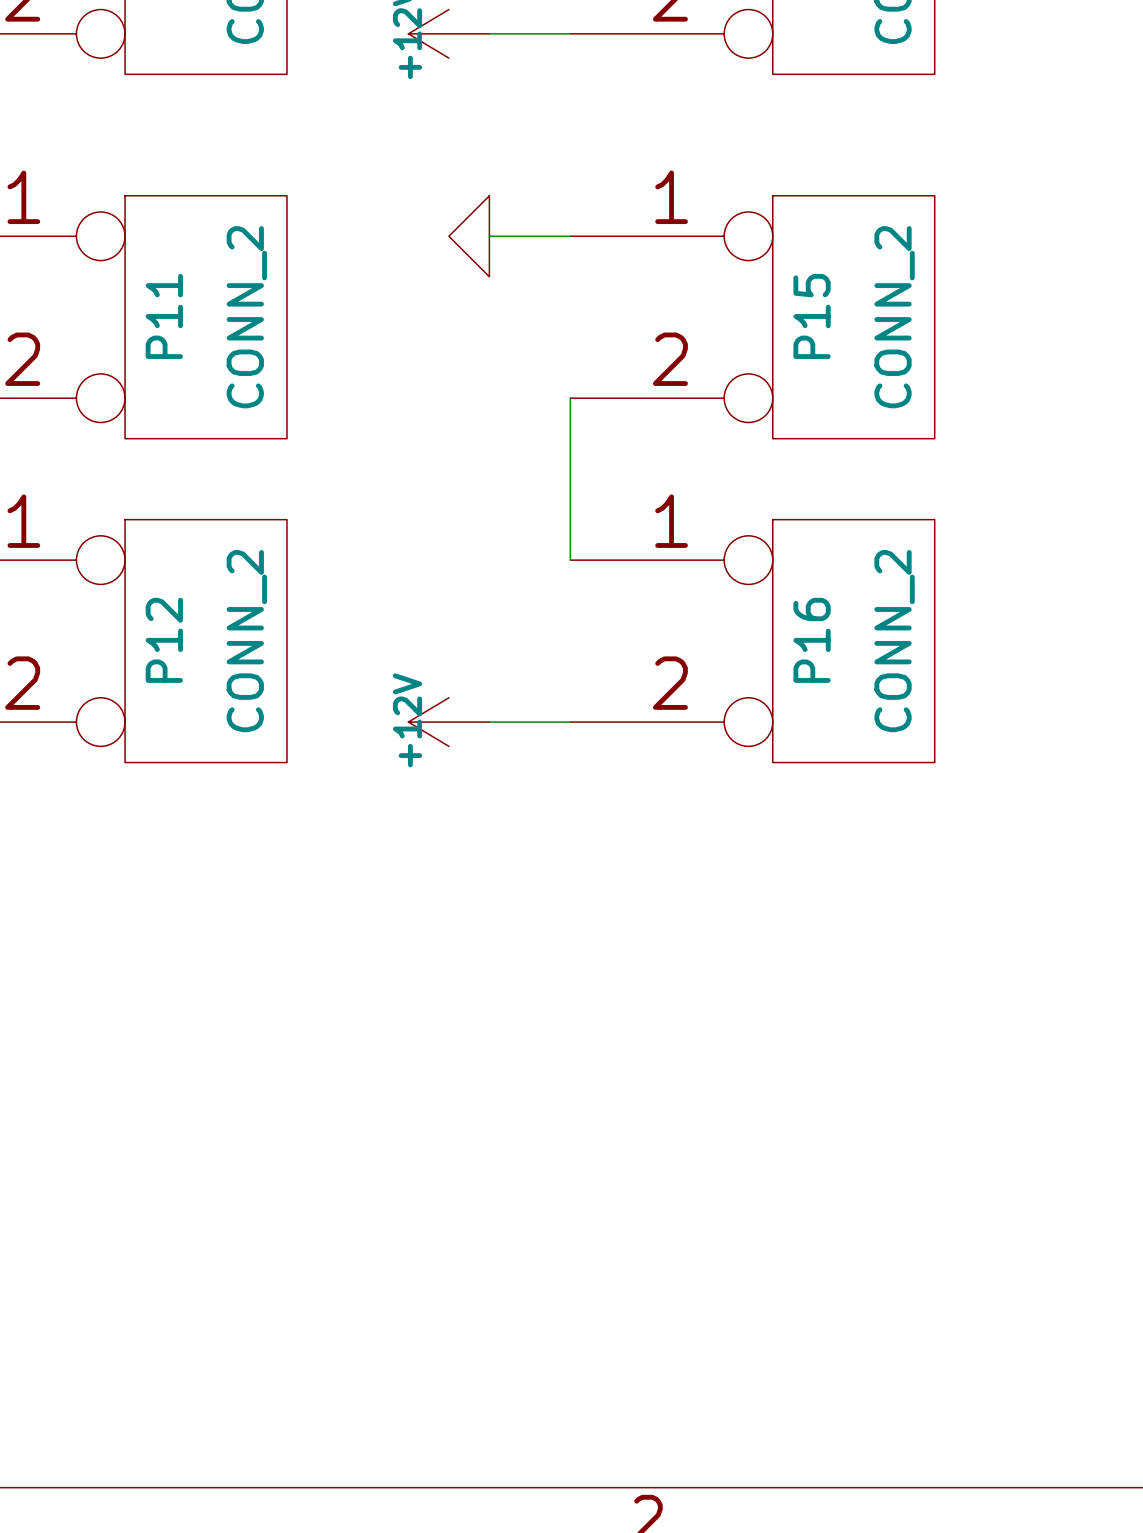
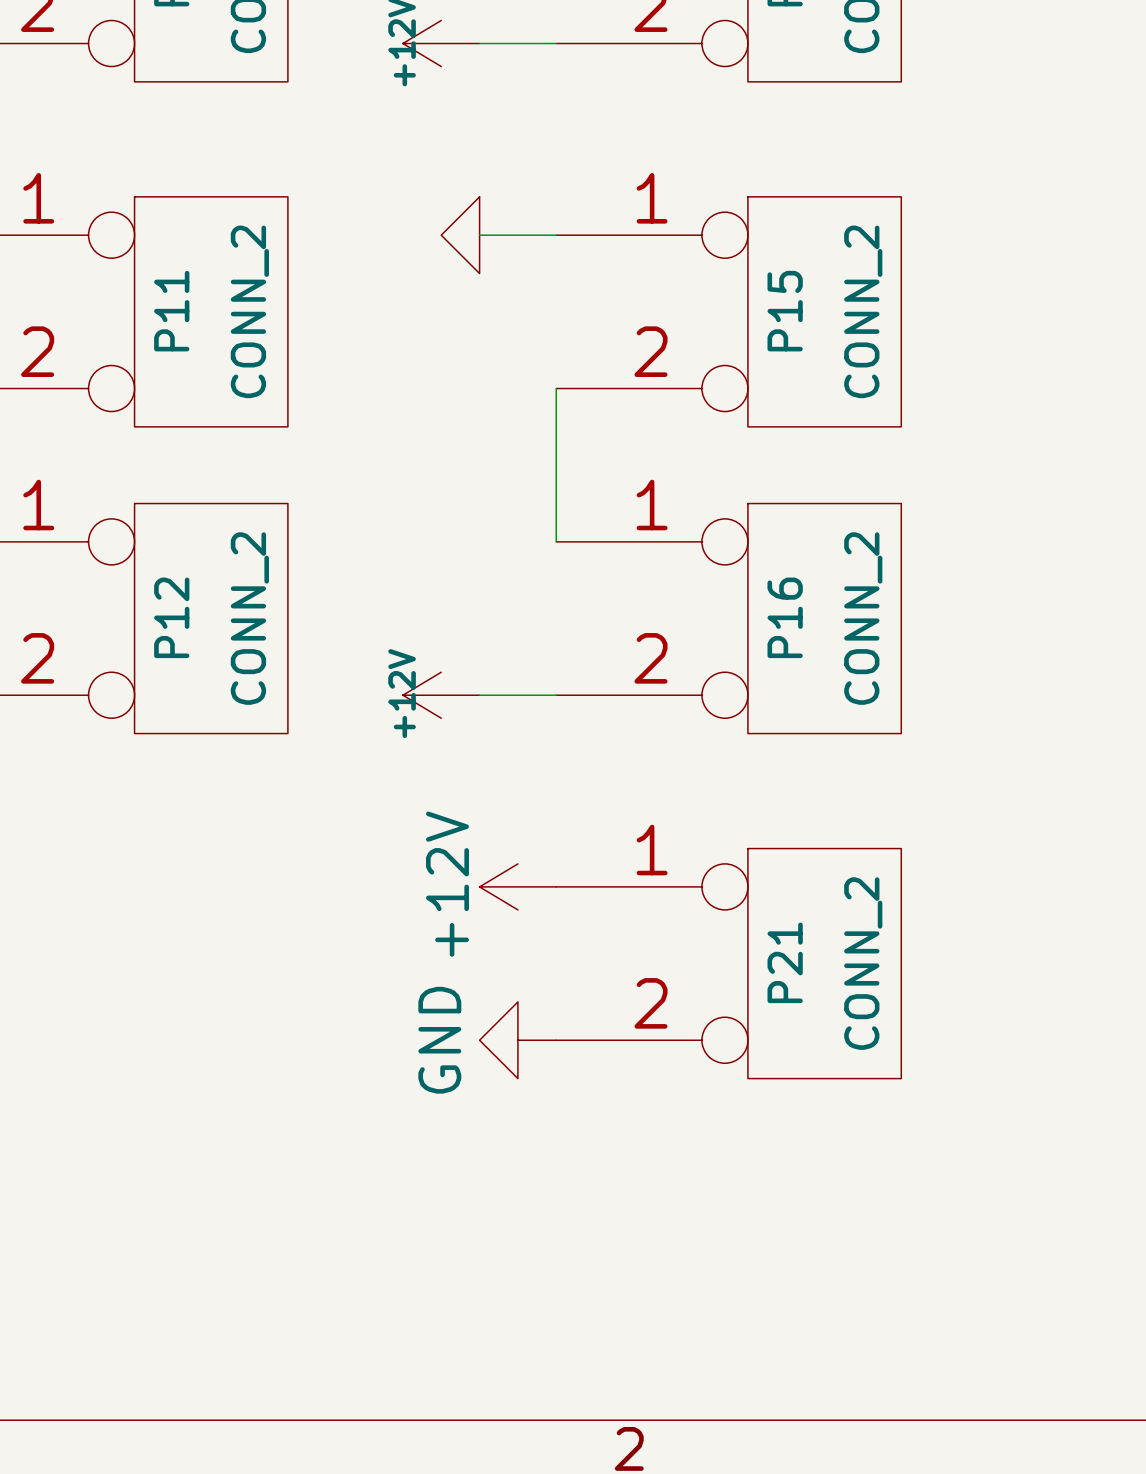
power symbol: none -> +12V (517, 886)
P21: none -> CONN_2 (728, 963)
power symbol: none -> GND (517, 1040)

